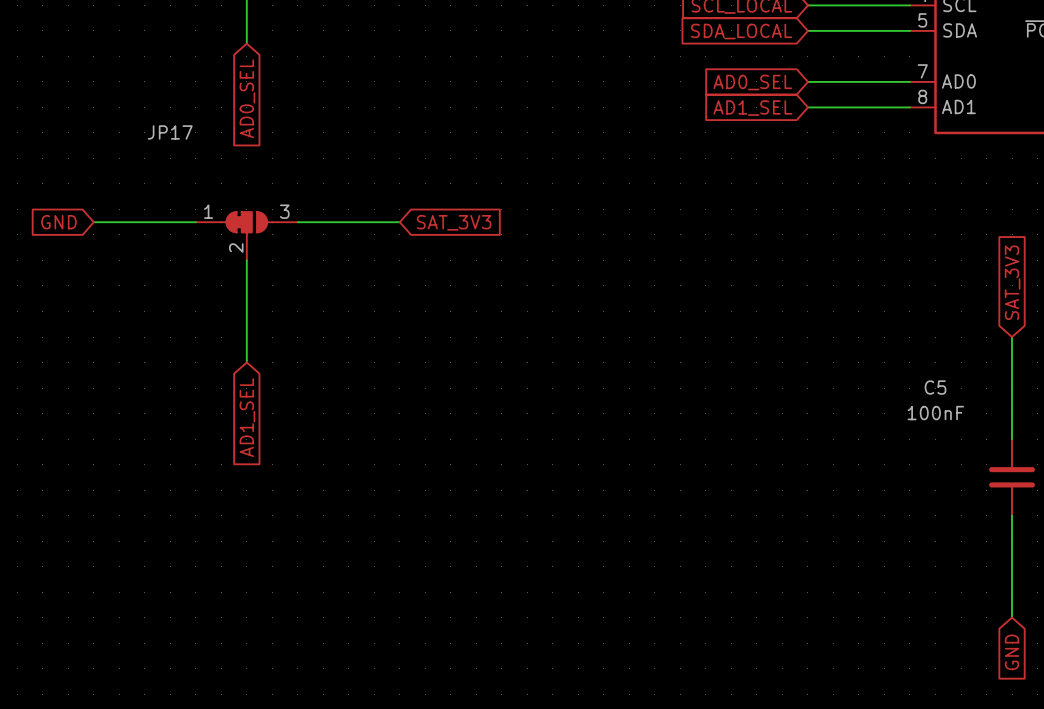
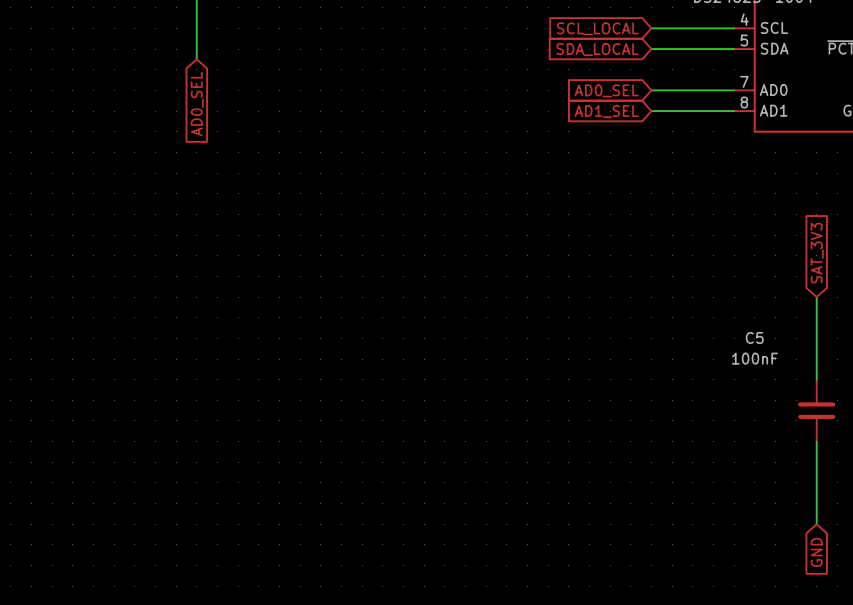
global label: GND (58, 222) -> none
wire: (93, 222) (195, 222) -> none
wire: (297, 222) (399, 222) -> none
global label: SAT_3V3 (454, 222) -> none
JP17: (246, 236) -> none
wire: (246, 260) (246, 362) -> none
global label: AD1_SEL (247, 417) -> none

